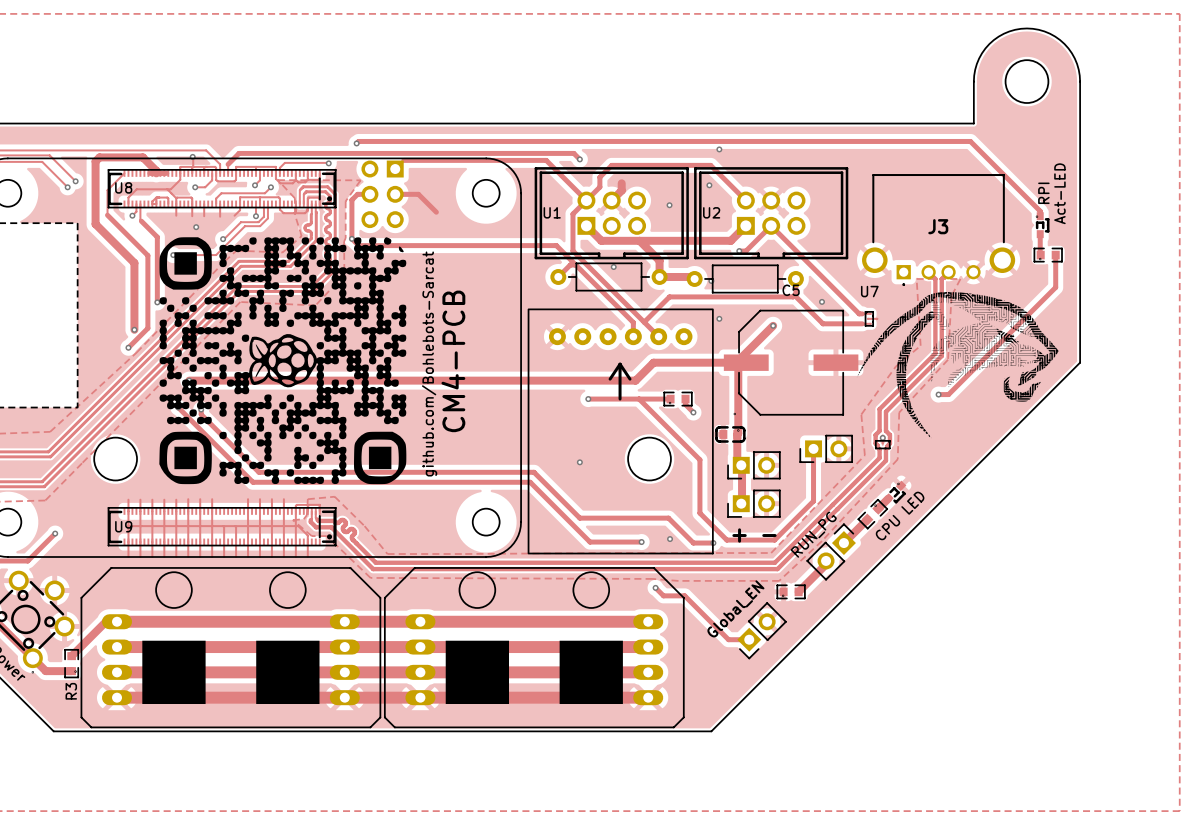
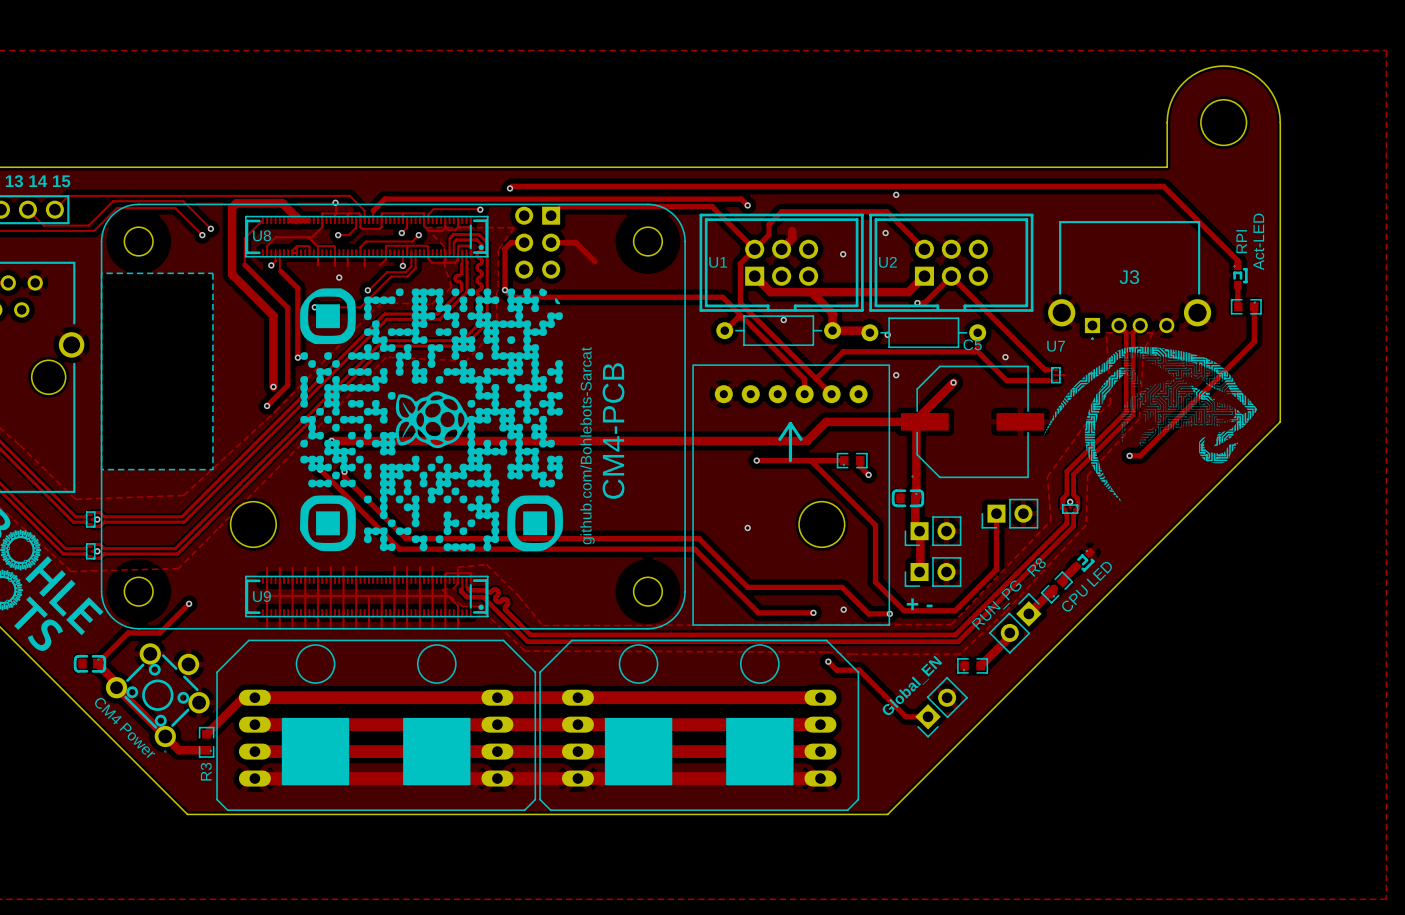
part rotation: 0° (1048, 255) -> 180° (1246, 306)
part: (872, 514) -> none
R8: none -> (1056, 587)

